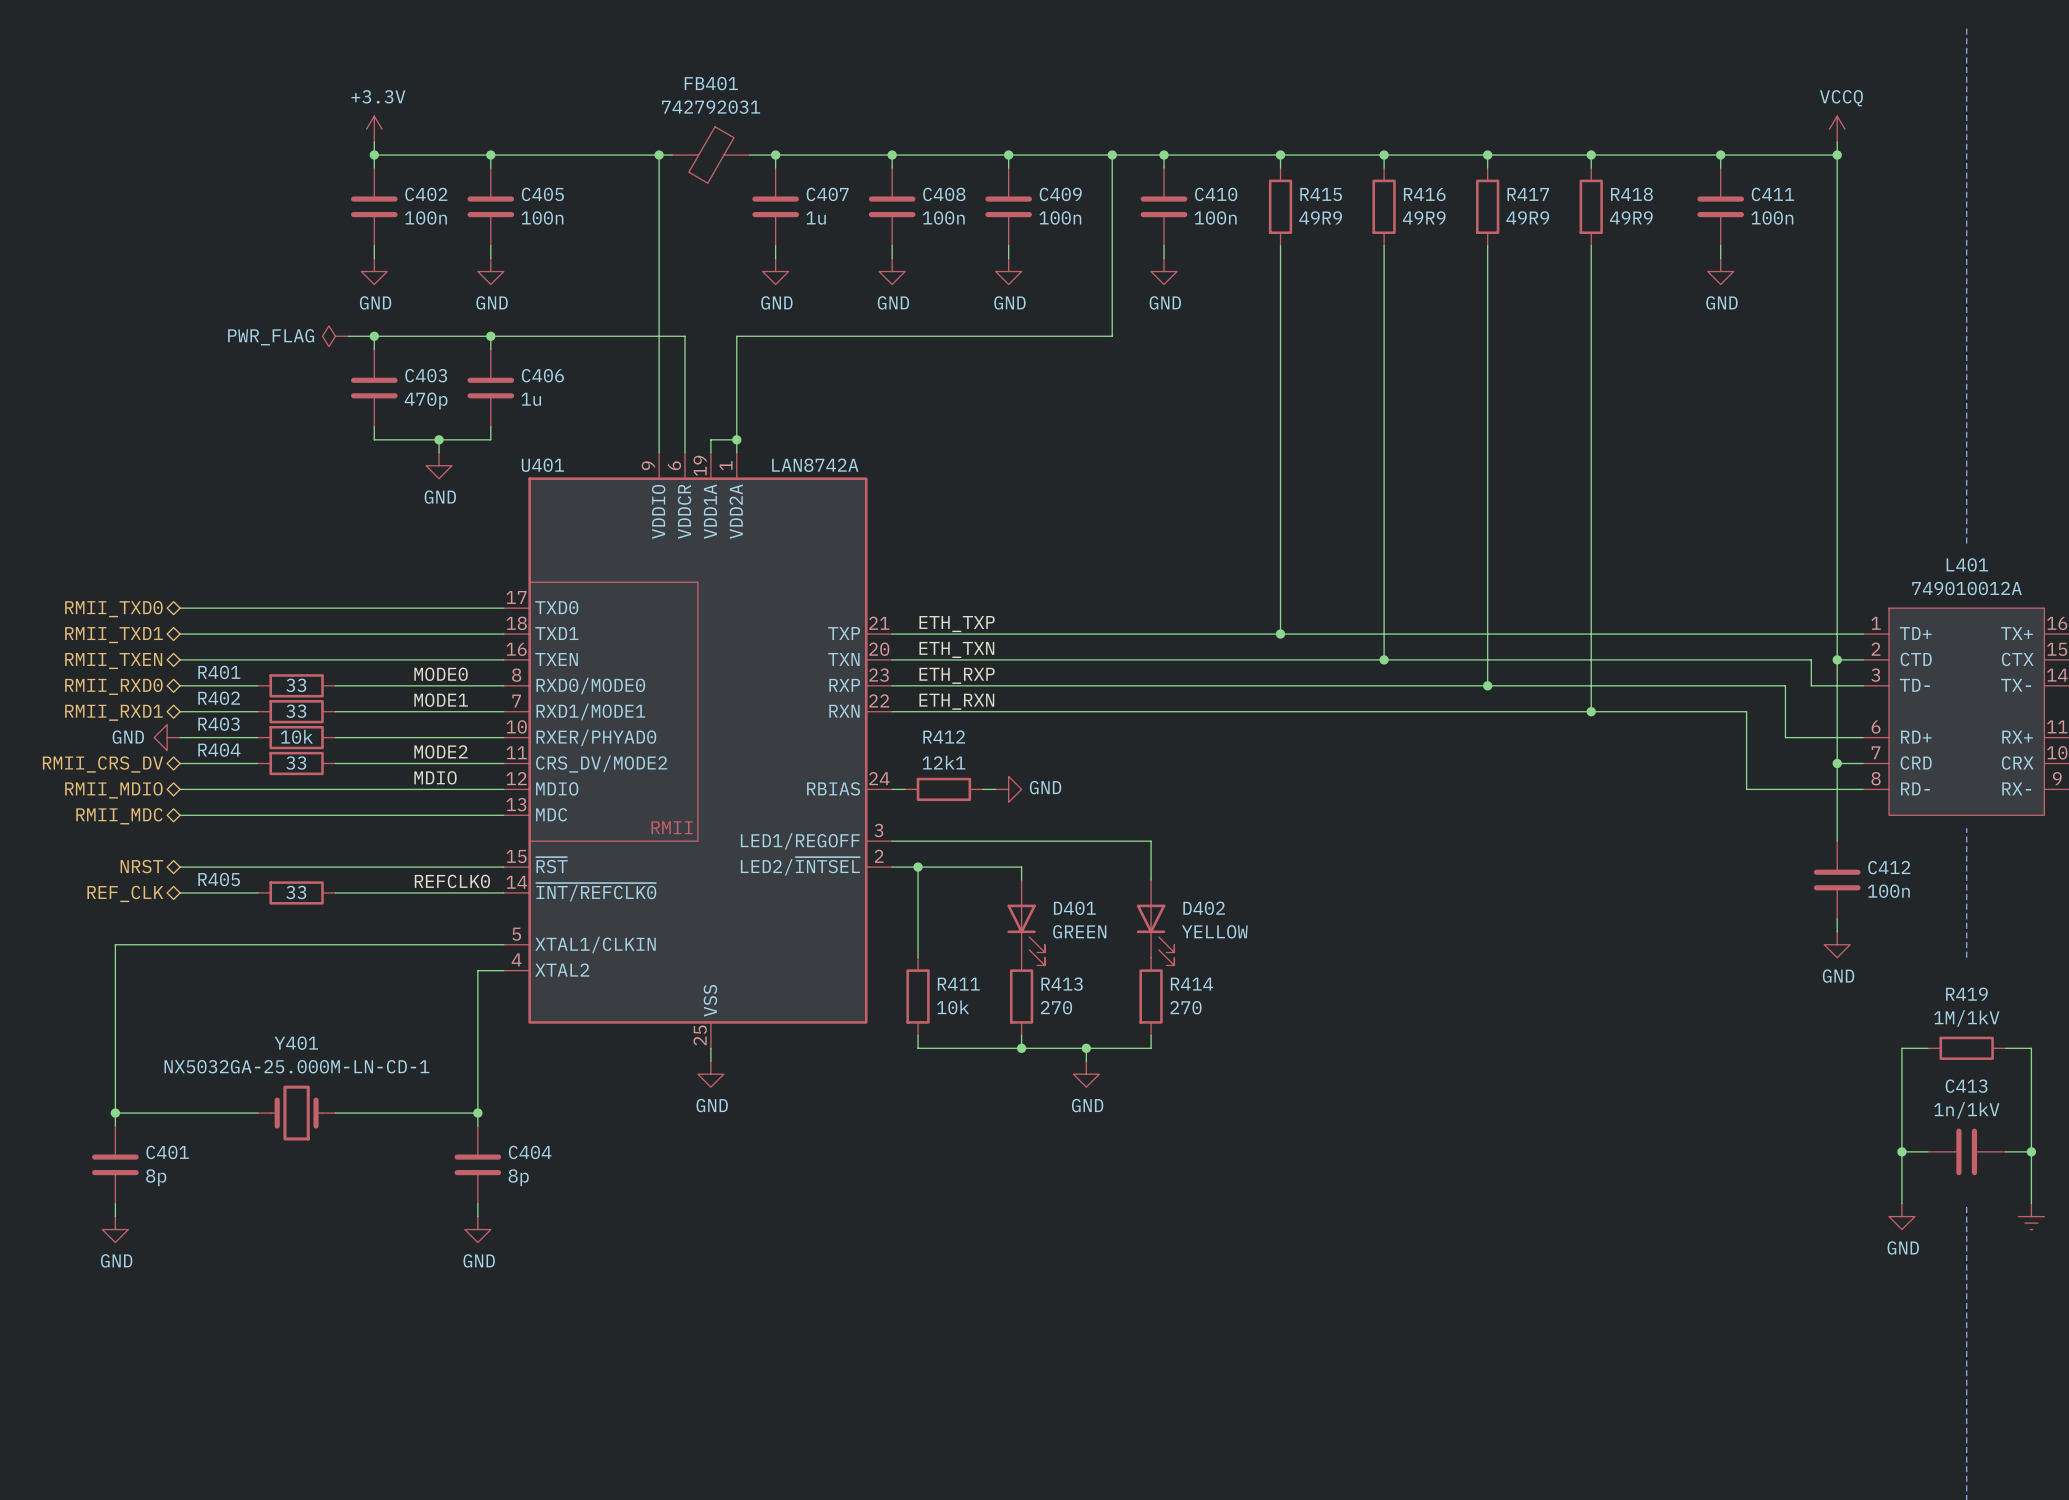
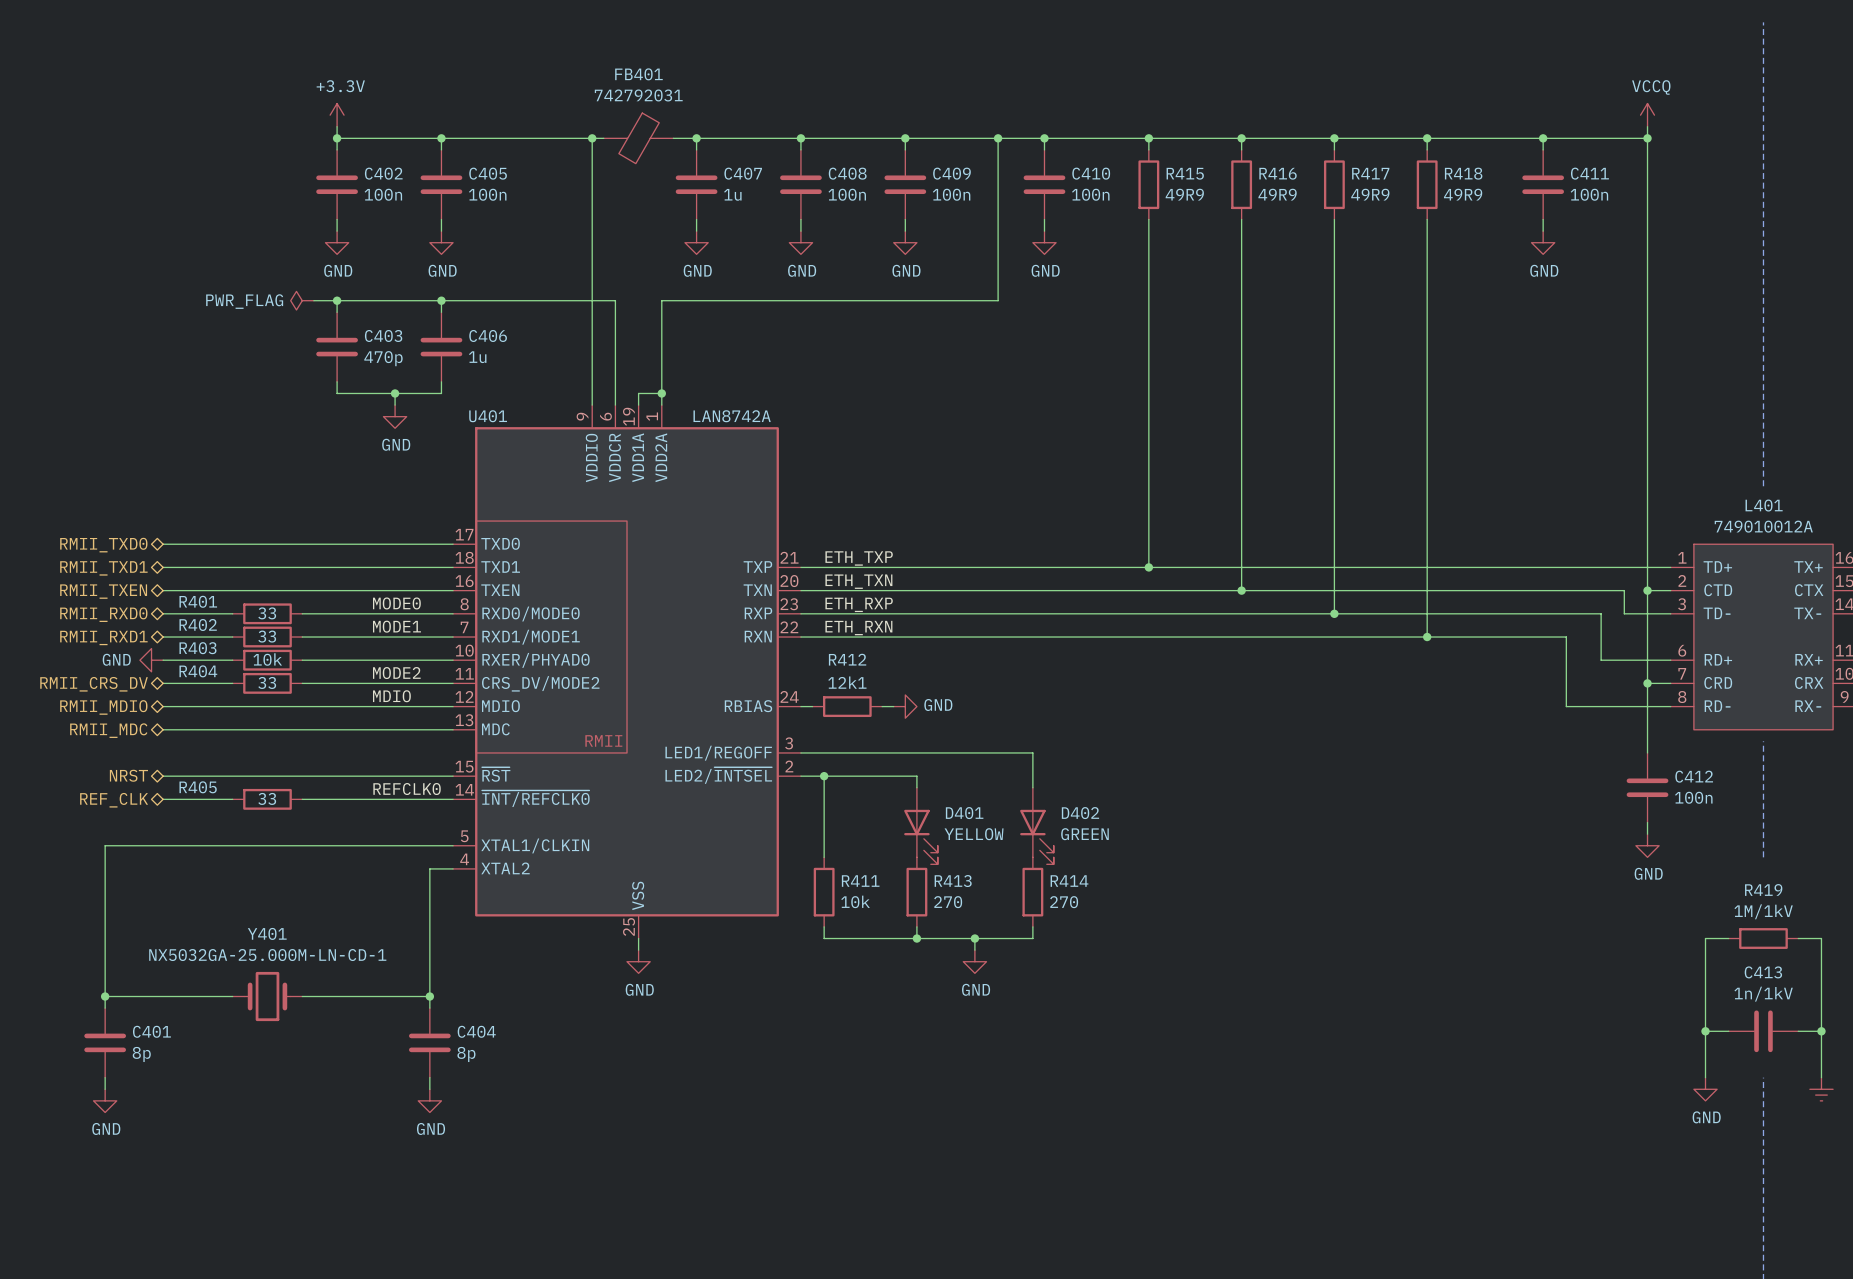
D401 value: GREEN (1079, 931) -> YELLOW (974, 834)
D402 value: YELLOW (1214, 931) -> GREEN (1084, 834)

